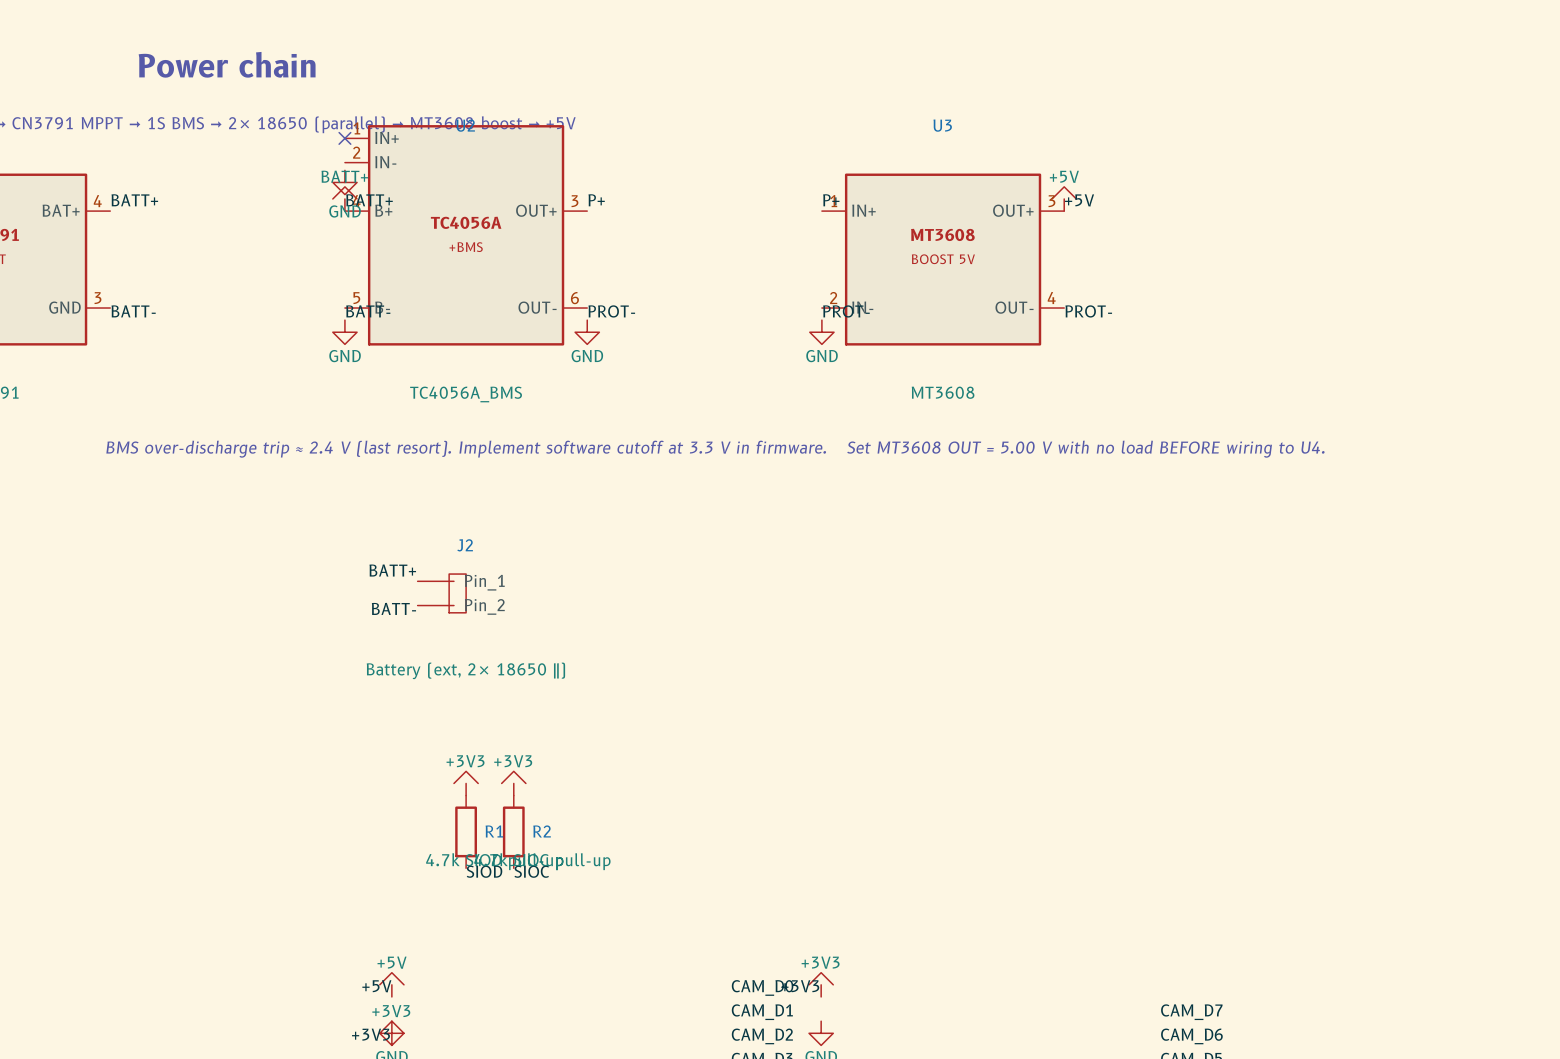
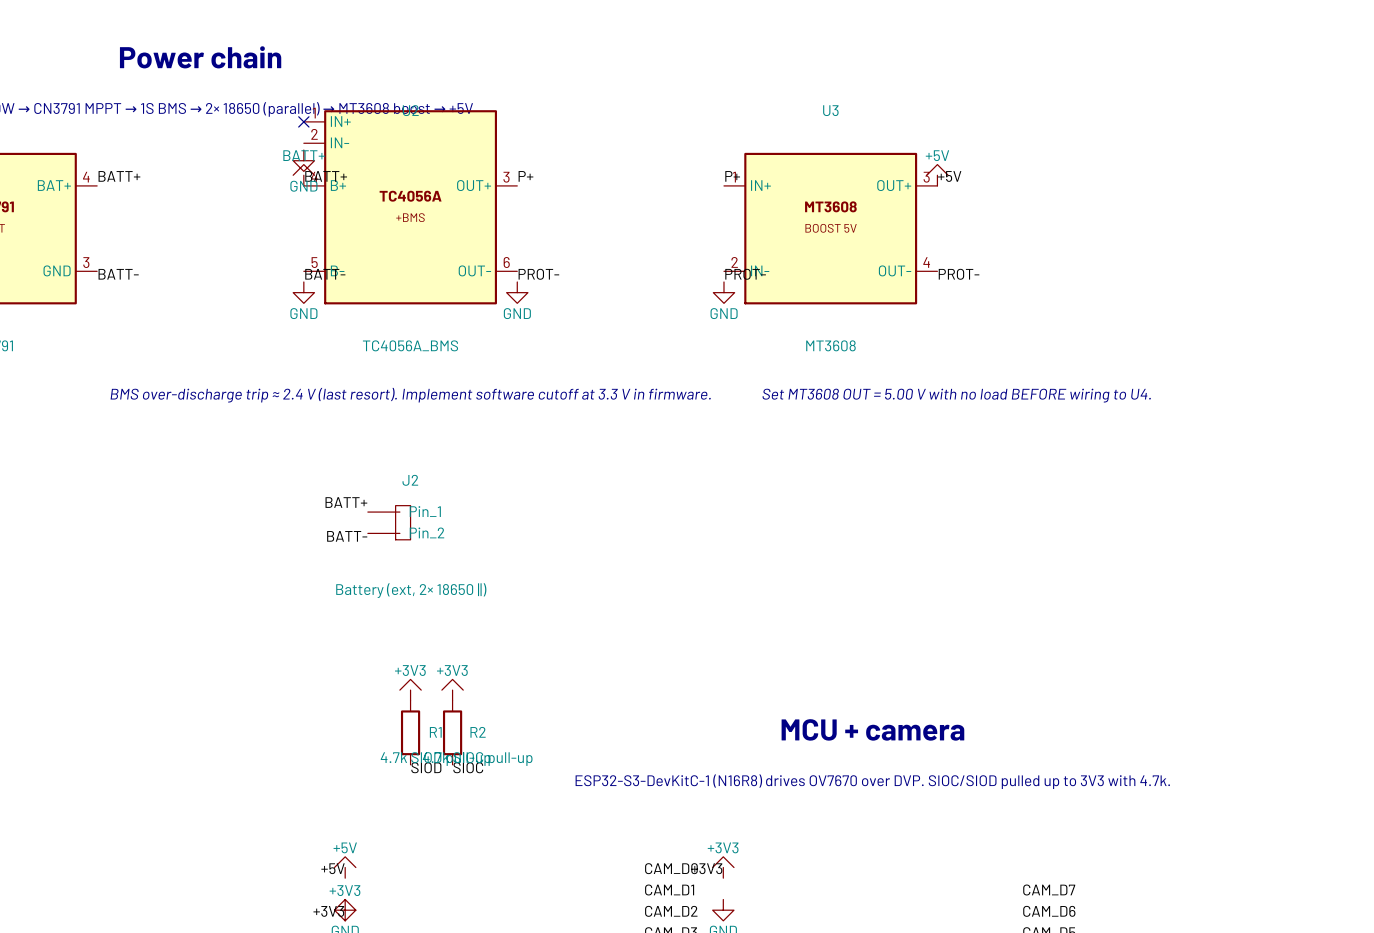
text: none -> MCU + camera (872, 729)
text: none -> ESP32-S3-DevKitC-1 (N16R8) drives OV7670 over DVP. SIOC/SIOD pulled up to 3V3 with 4.7k. (872, 781)

